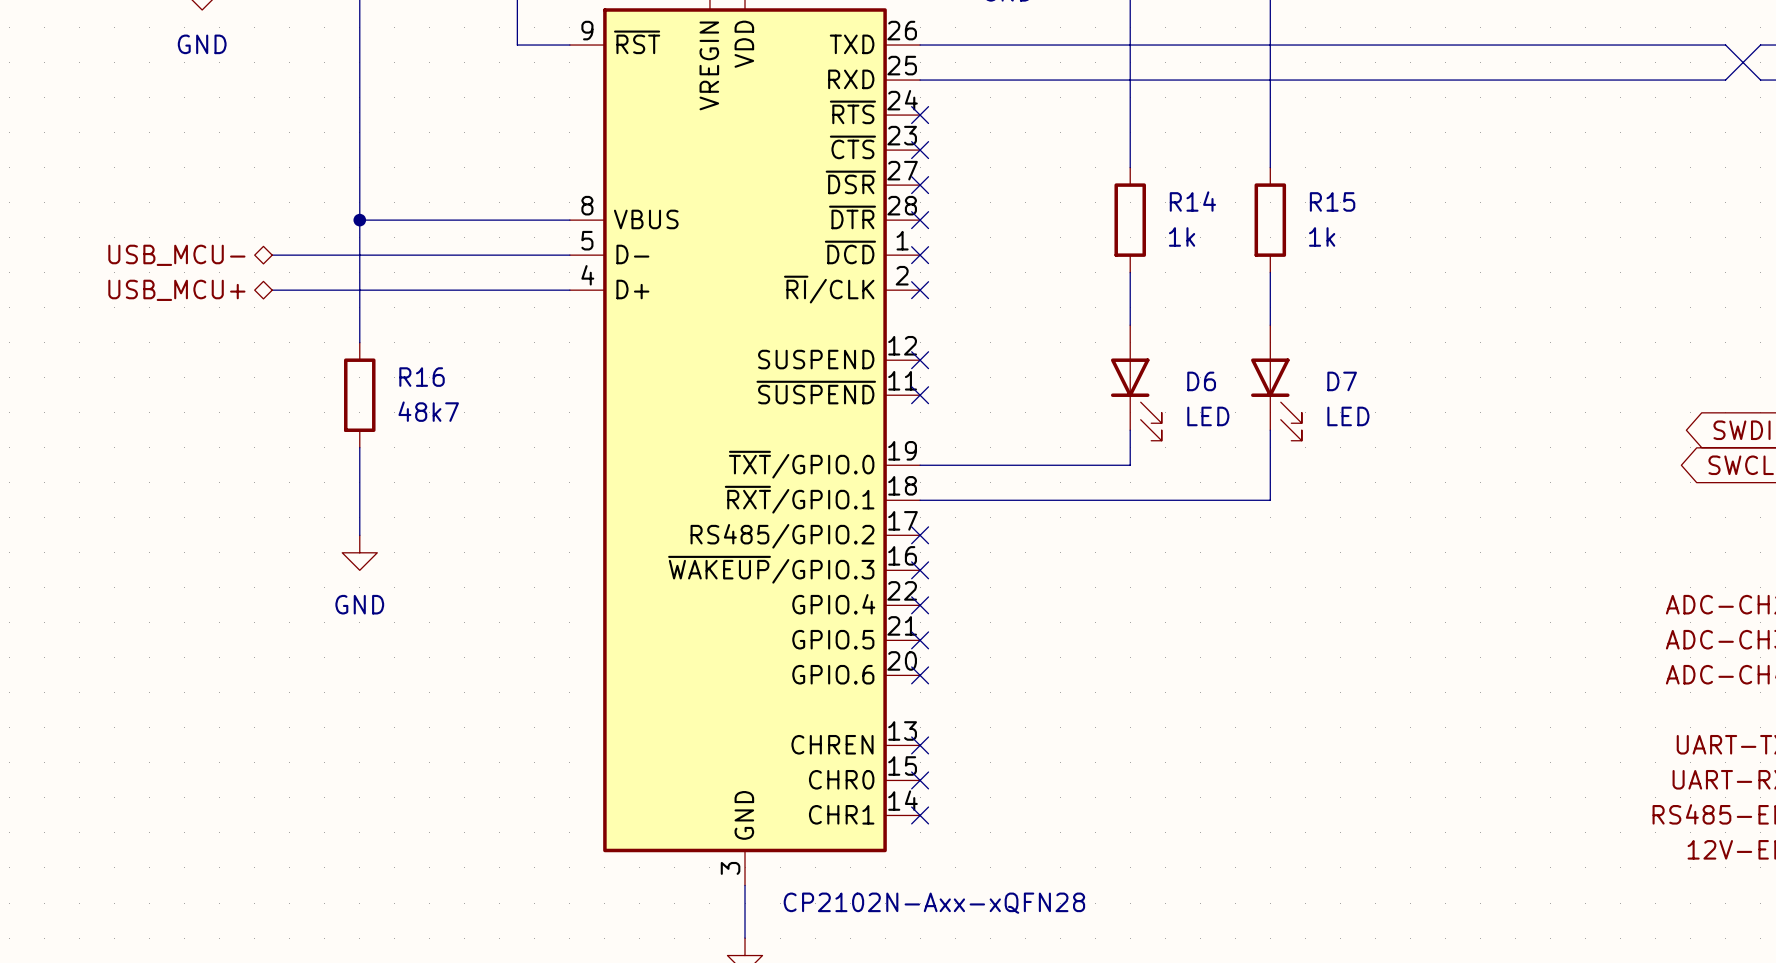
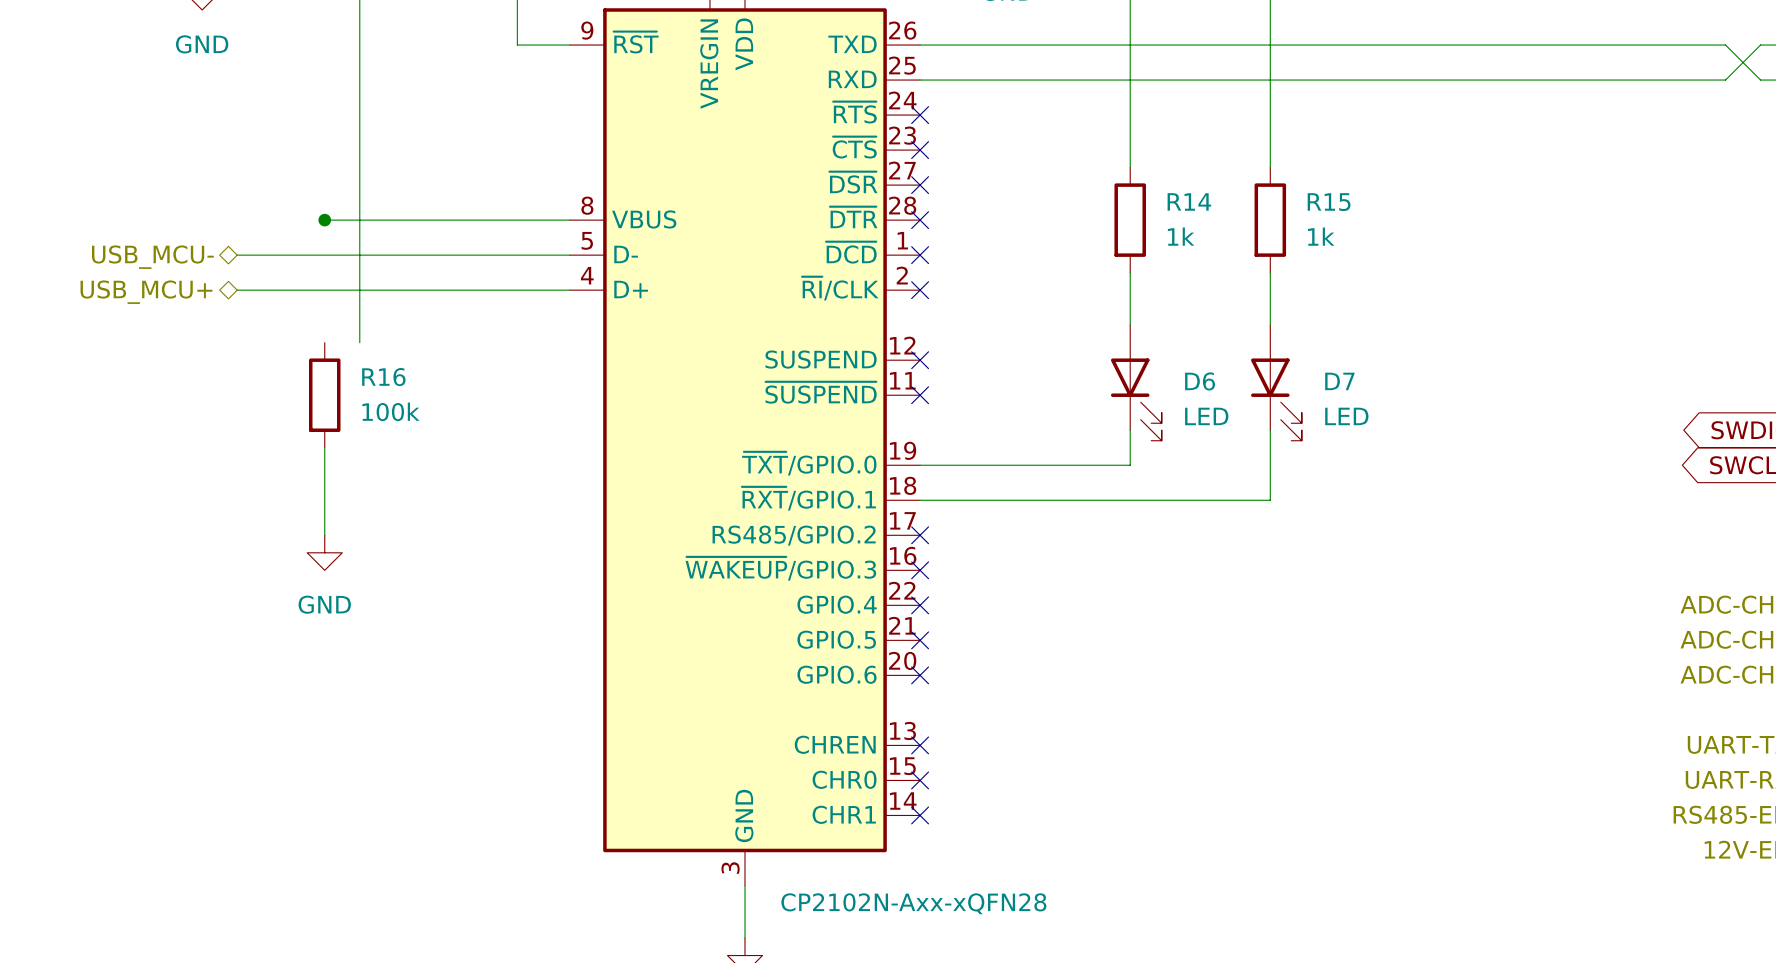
wire: none -> (324, 220) (359, 220)
junction position: (359, 220) -> (324, 220)
hierarchical label position: USB_MCU- (176, 255) -> USB_MCU- (152, 257)
wire: none -> (237, 255) (272, 255)
hierarchical label position: USB_MCU+ (176, 290) -> USB_MCU+ (146, 292)
wire: none -> (237, 290) (272, 290)
R16 position: (359, 395) -> (324, 395)
R16 value: 48k7 (428, 411) -> 100k (390, 411)
wire: (359, 447) (359, 535) -> (324, 447) (324, 535)
power symbol position: GND (359, 552) -> GND (324, 552)

